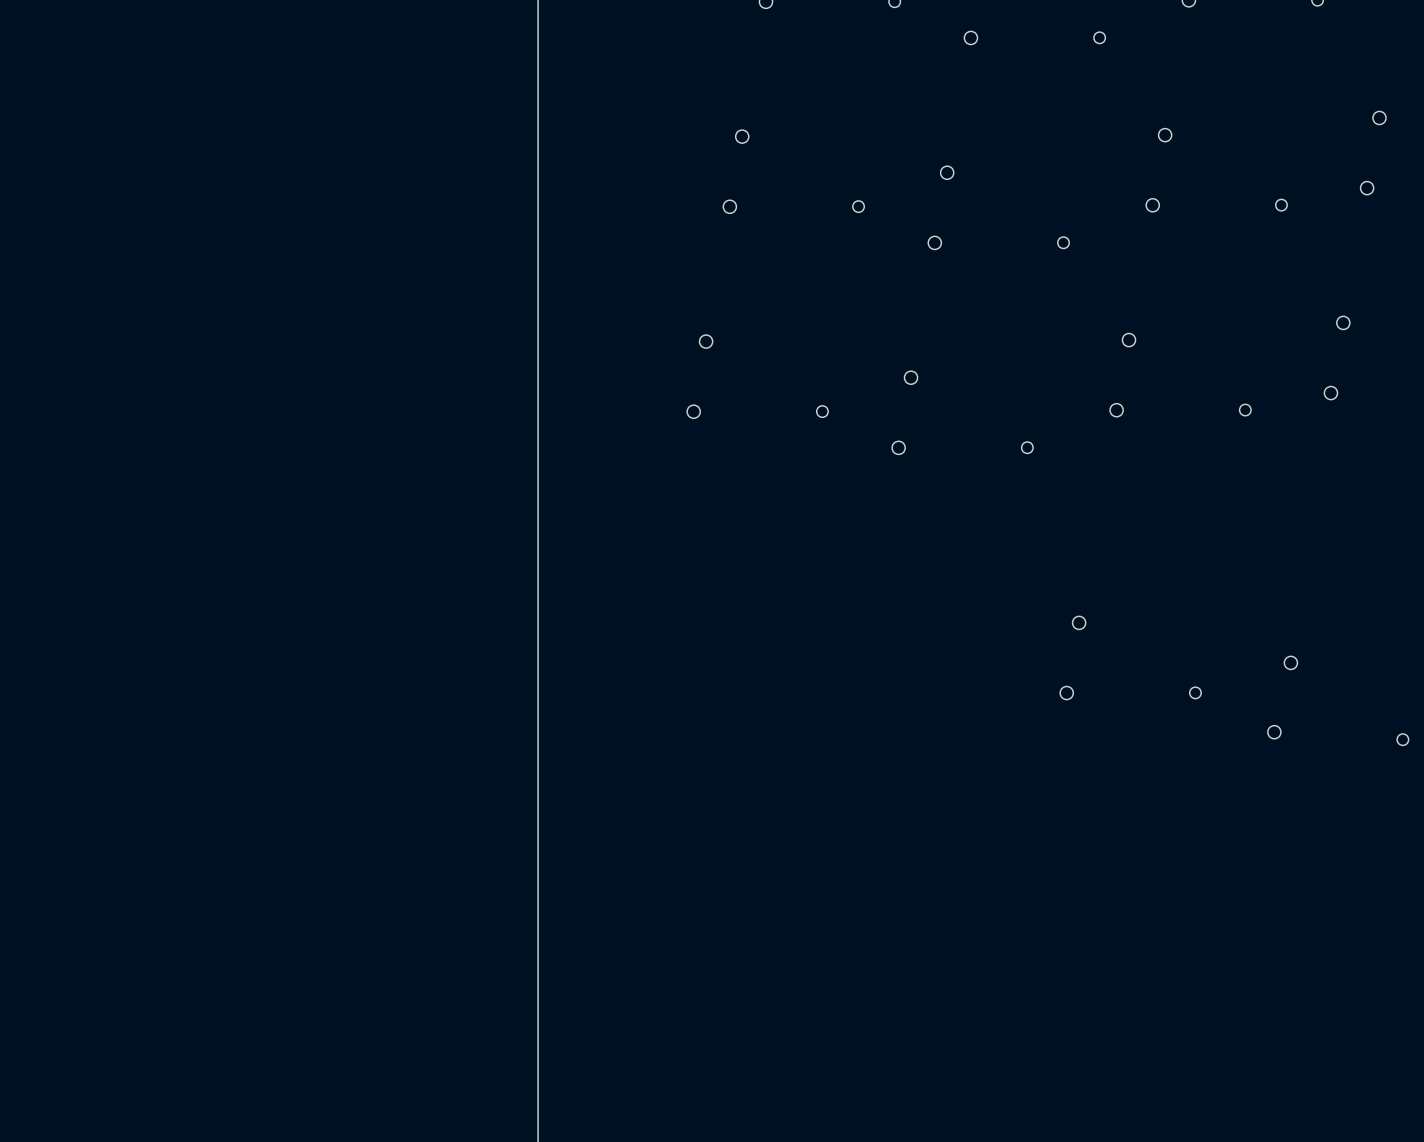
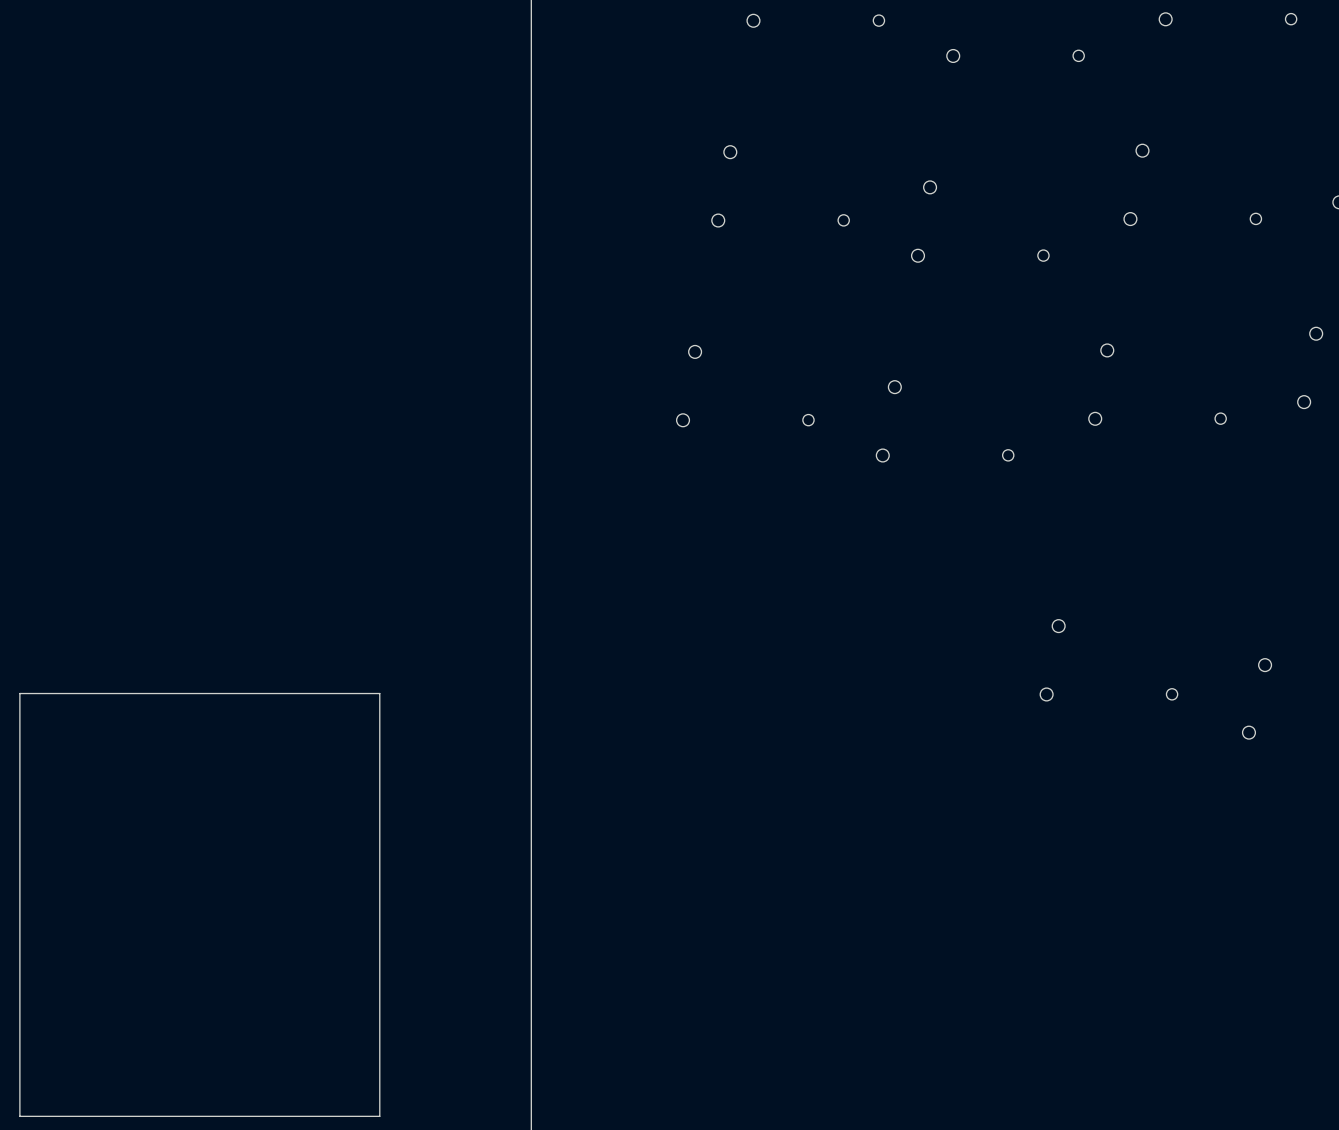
board edge: none -> (379, 693) (19, 693) (19, 1116) (379, 1116) (379, 693)

